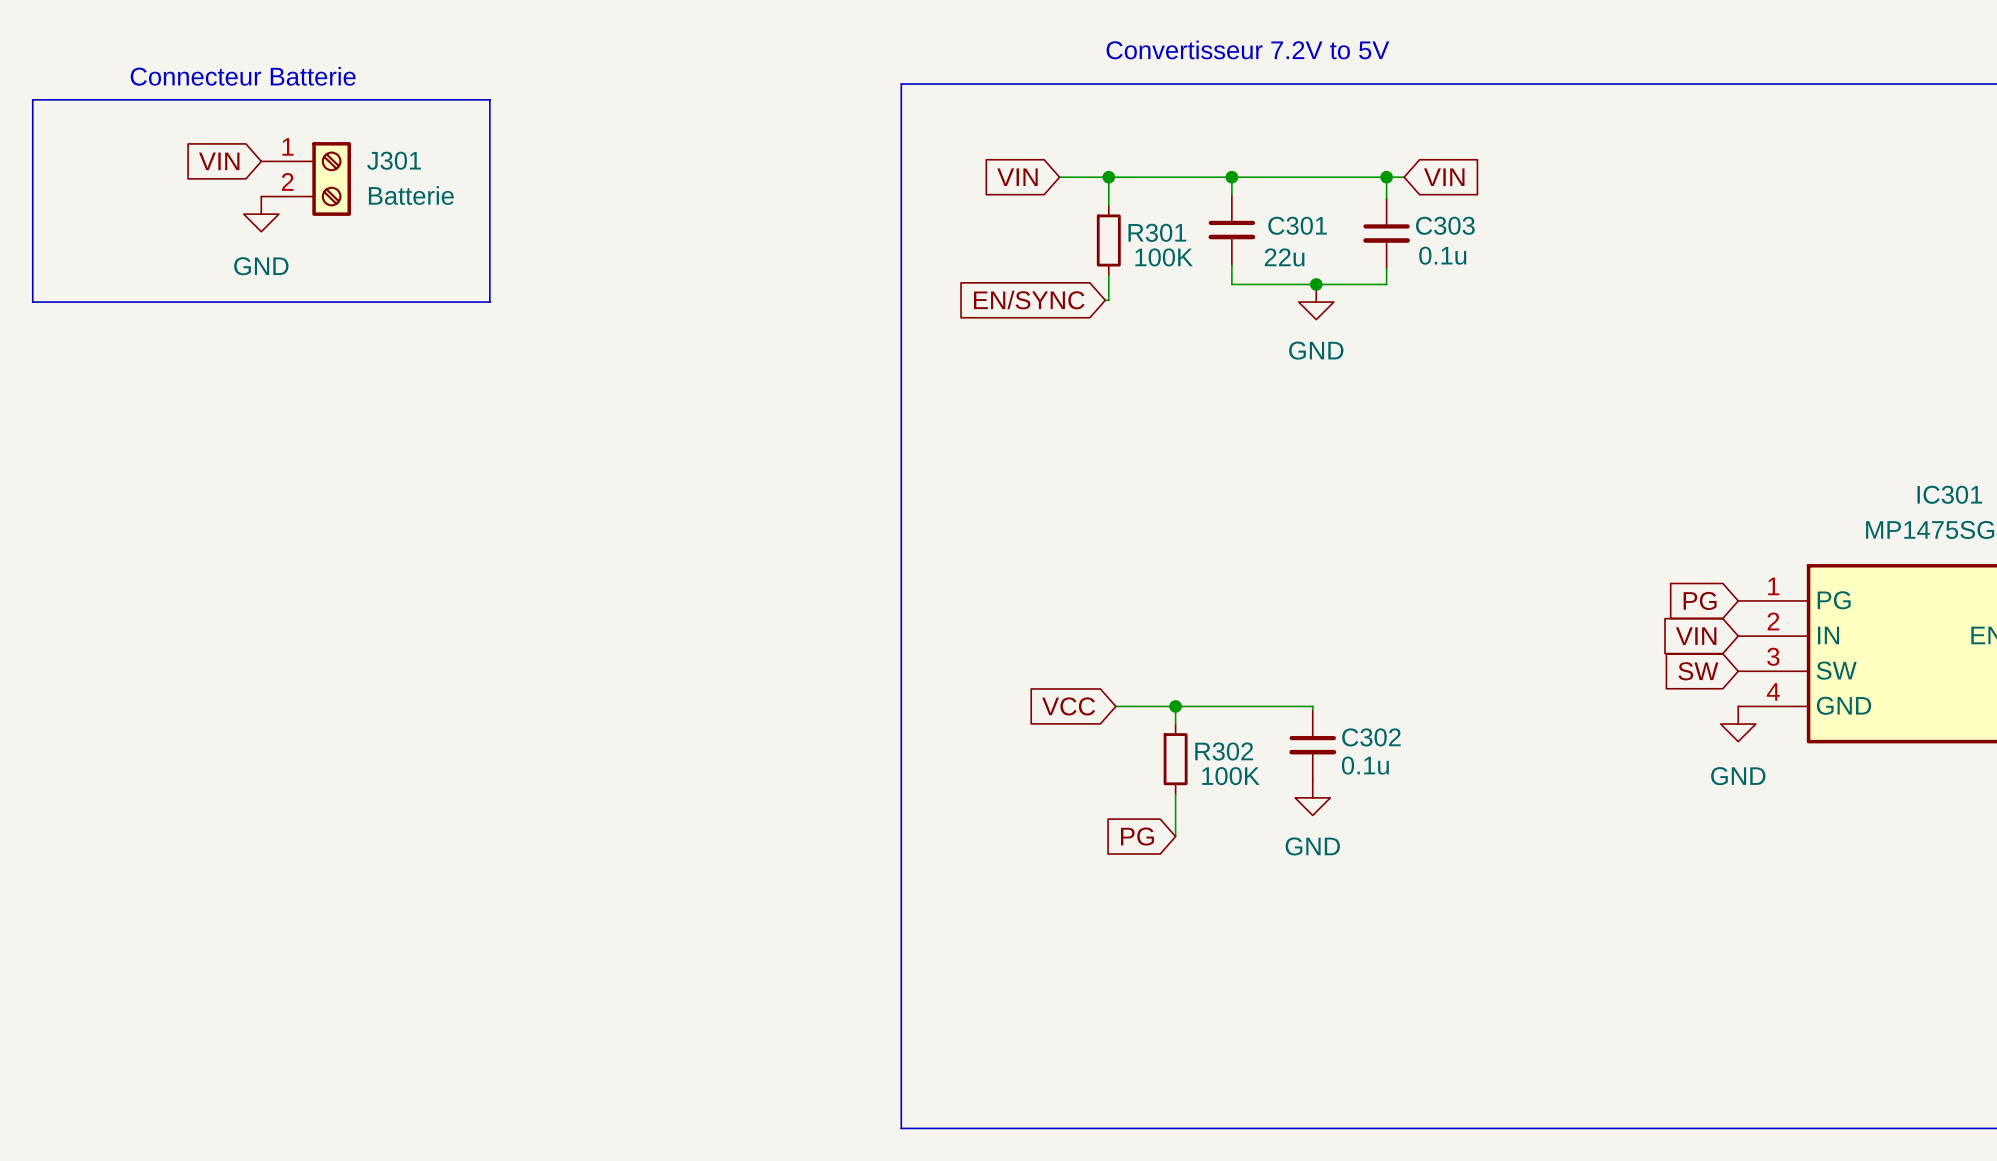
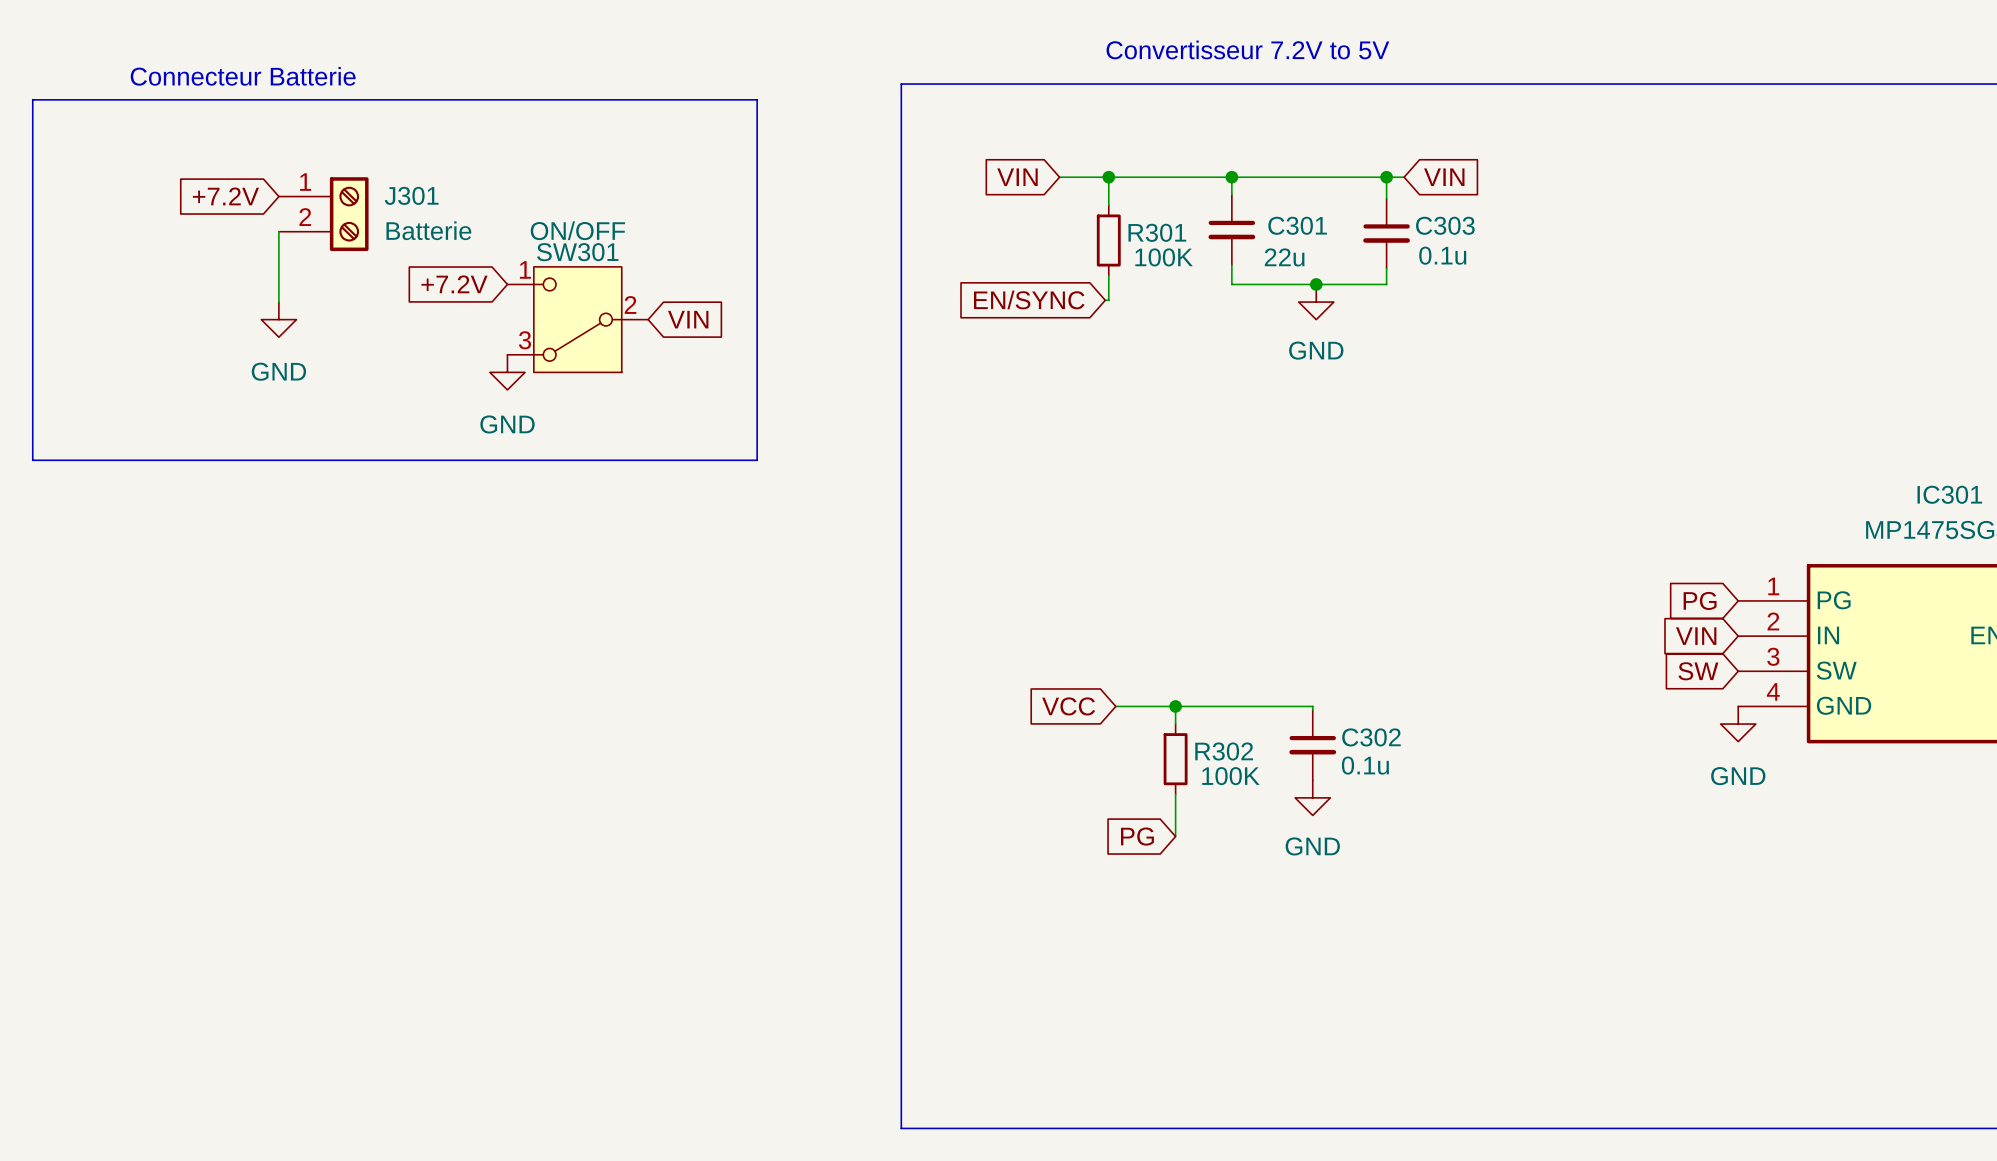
line: (489, 99) (489, 302) (32, 302) -> (489, 99) (757, 99) (757, 460) (32, 460) (32, 302)
global label: VIN (219, 161) -> none
J301 position: (306, 178) -> (323, 214)
global label: none -> +7.2V (225, 196)
power symbol position: GND (261, 214) -> GND (278, 319)
wire: none -> (278, 231) (278, 302)
global label: none -> +7.2V (454, 284)
SW301: none -> ON/OFF (577, 319)
global label: none -> VIN (688, 319)
power symbol: none -> GND (507, 372)

